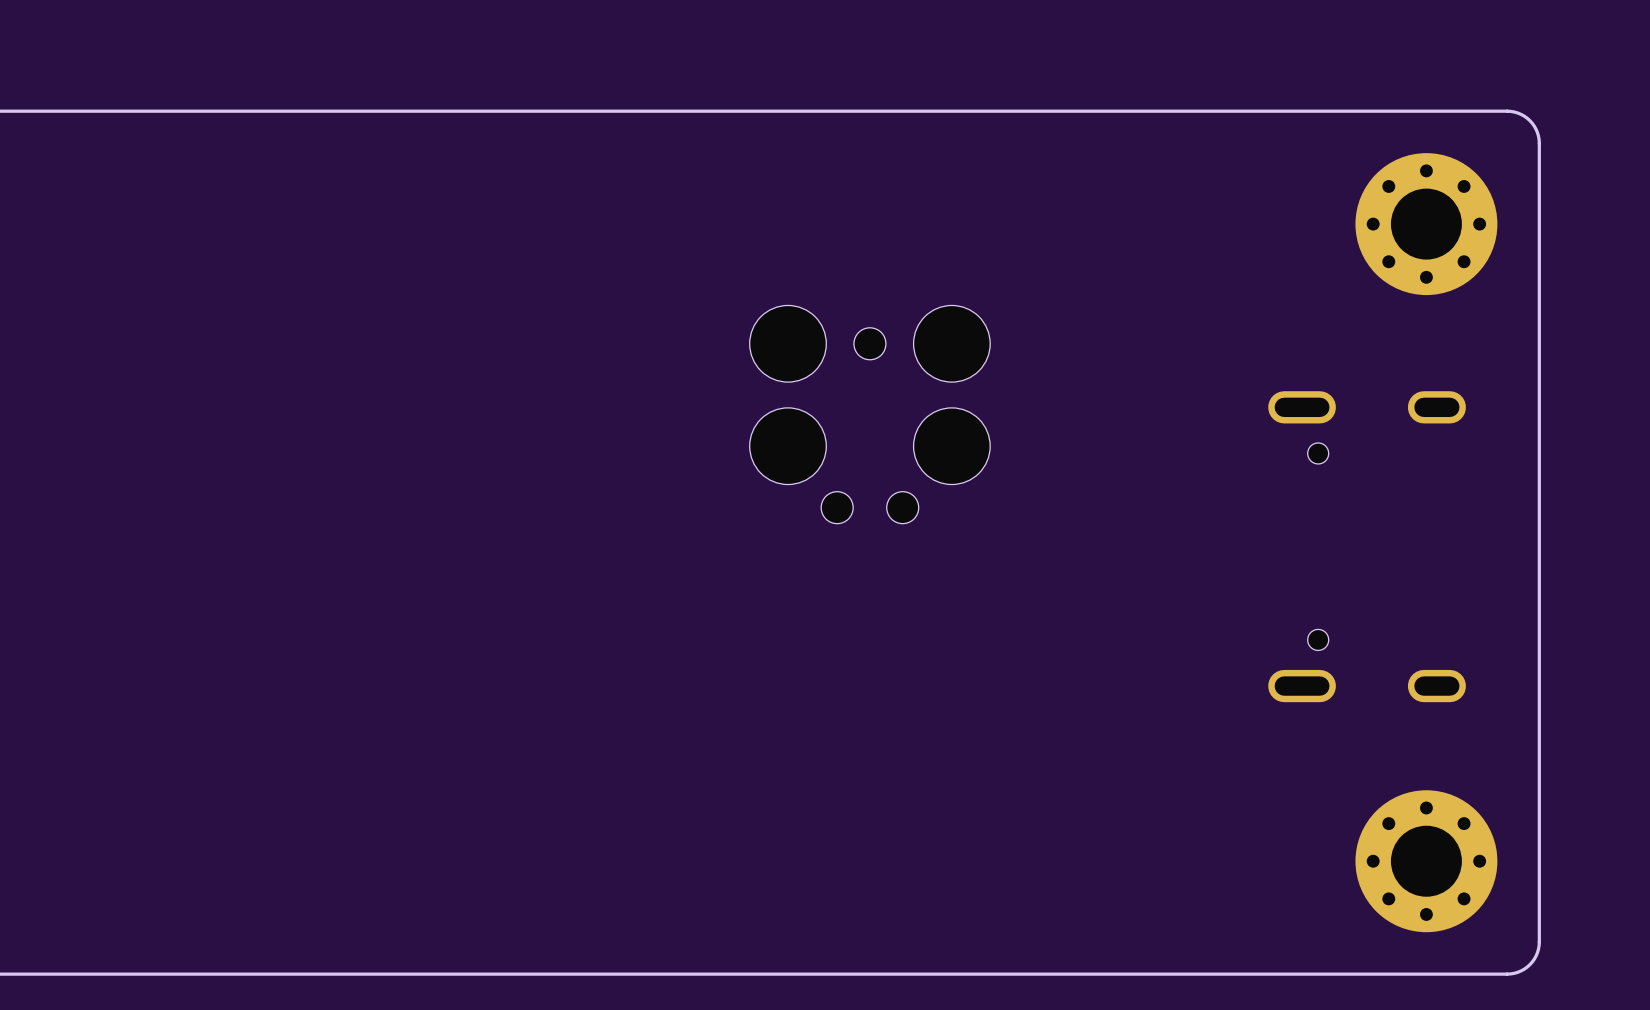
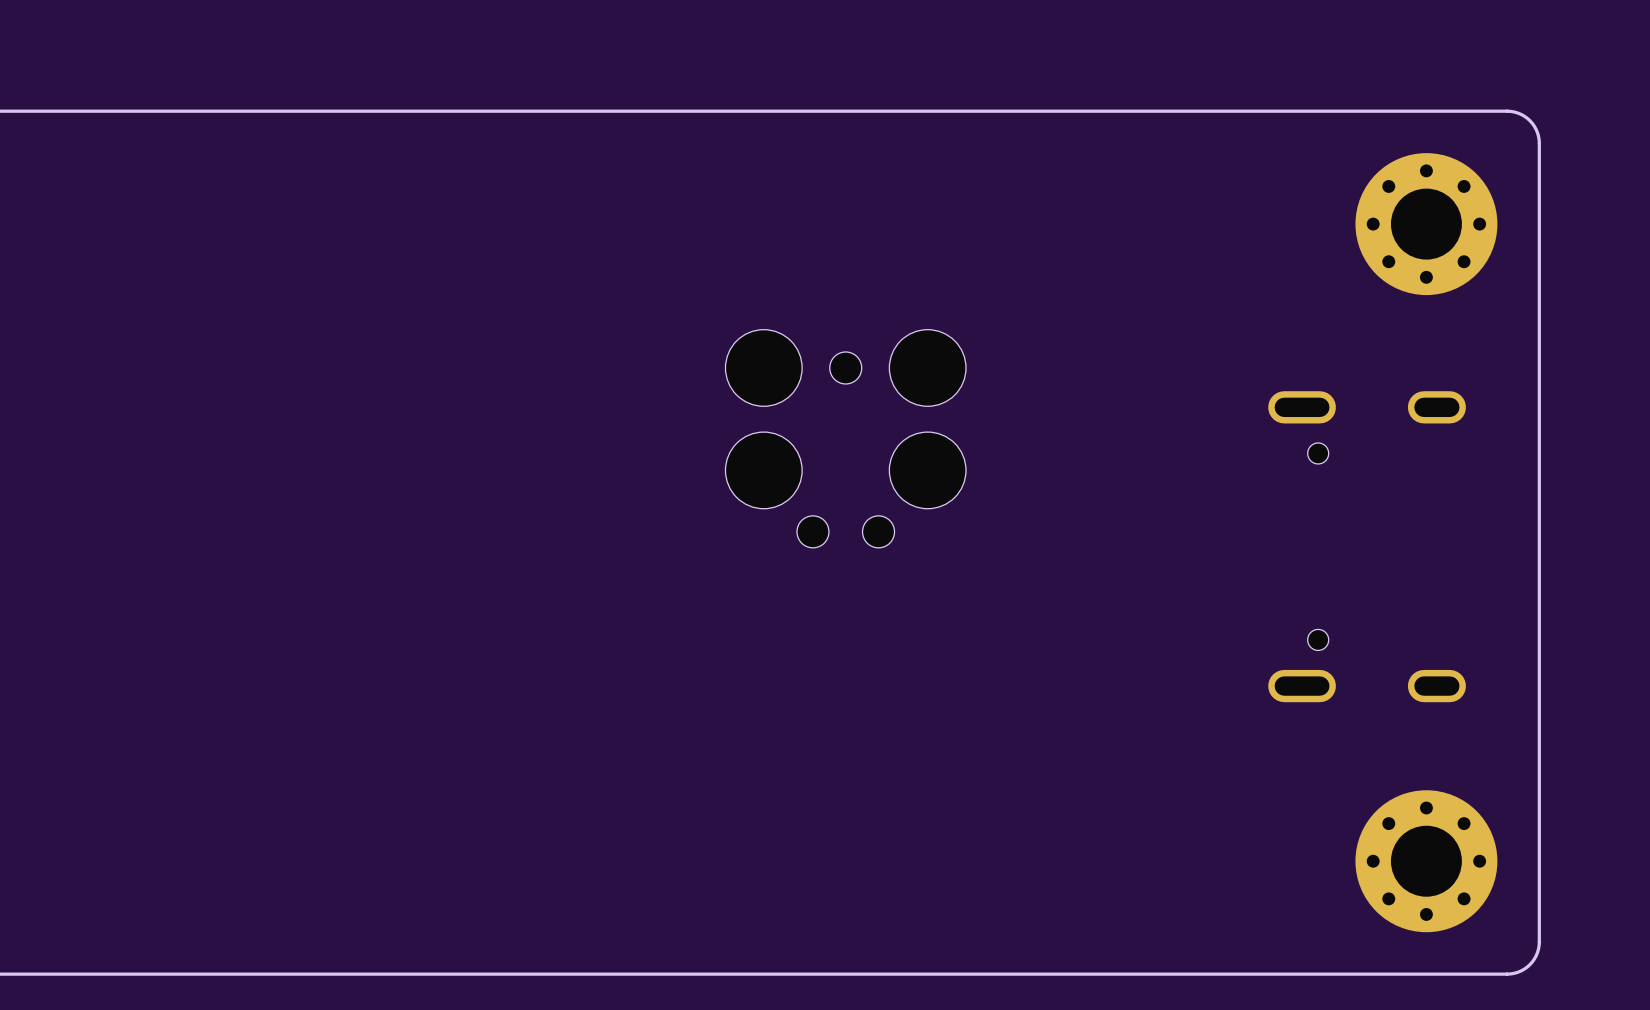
part position: (869, 414) -> (845, 438)

